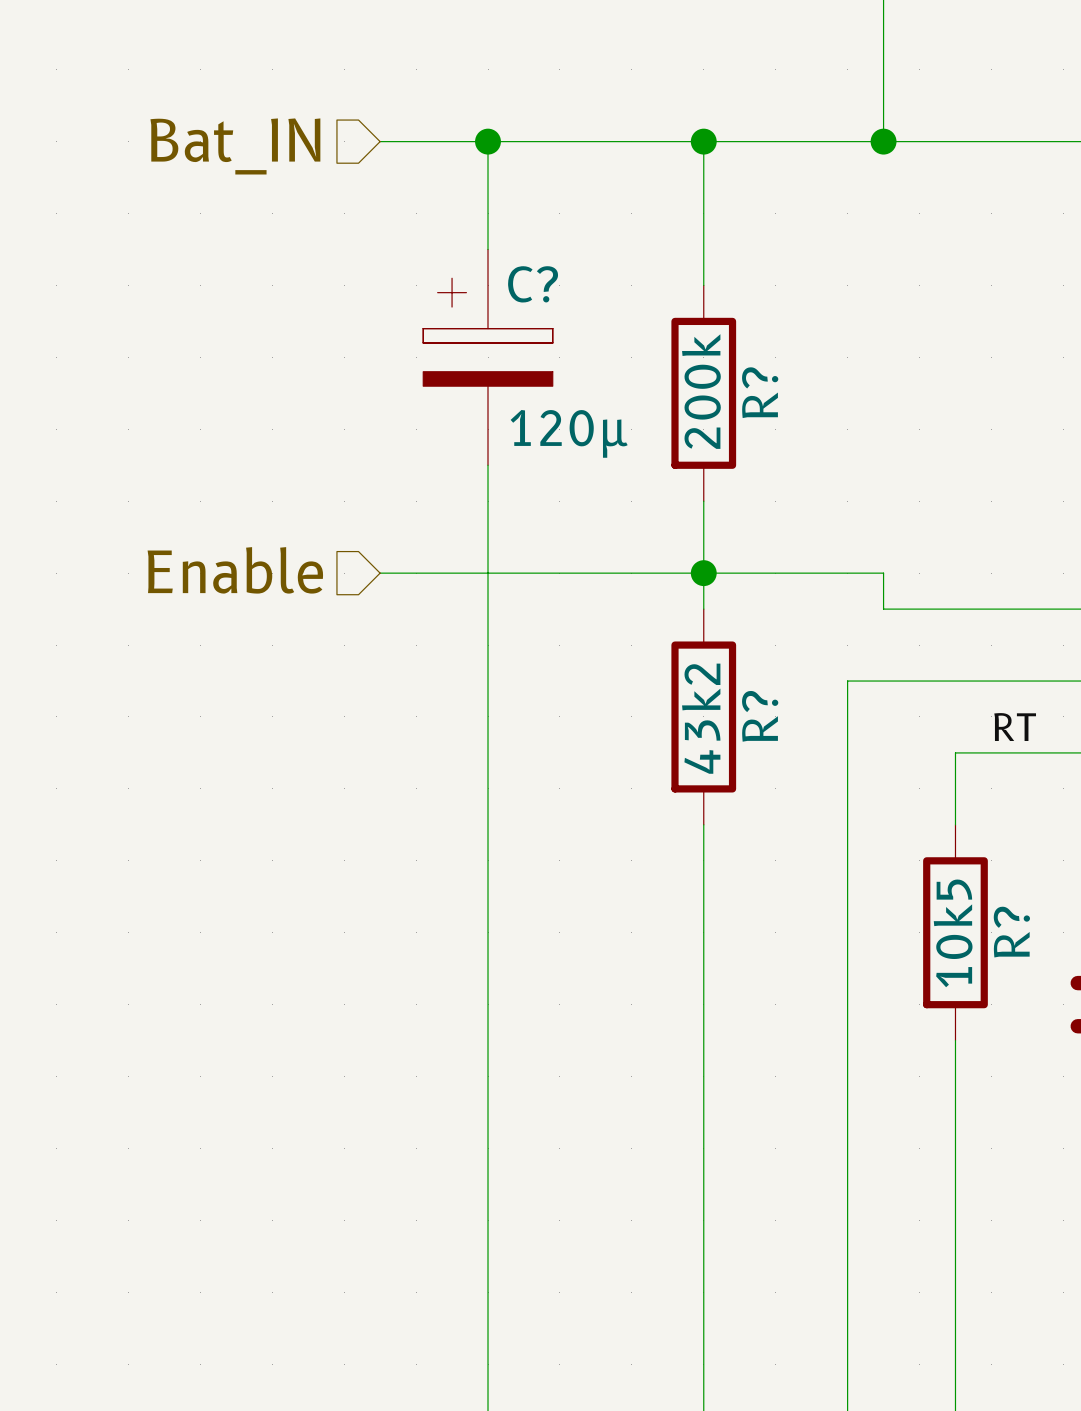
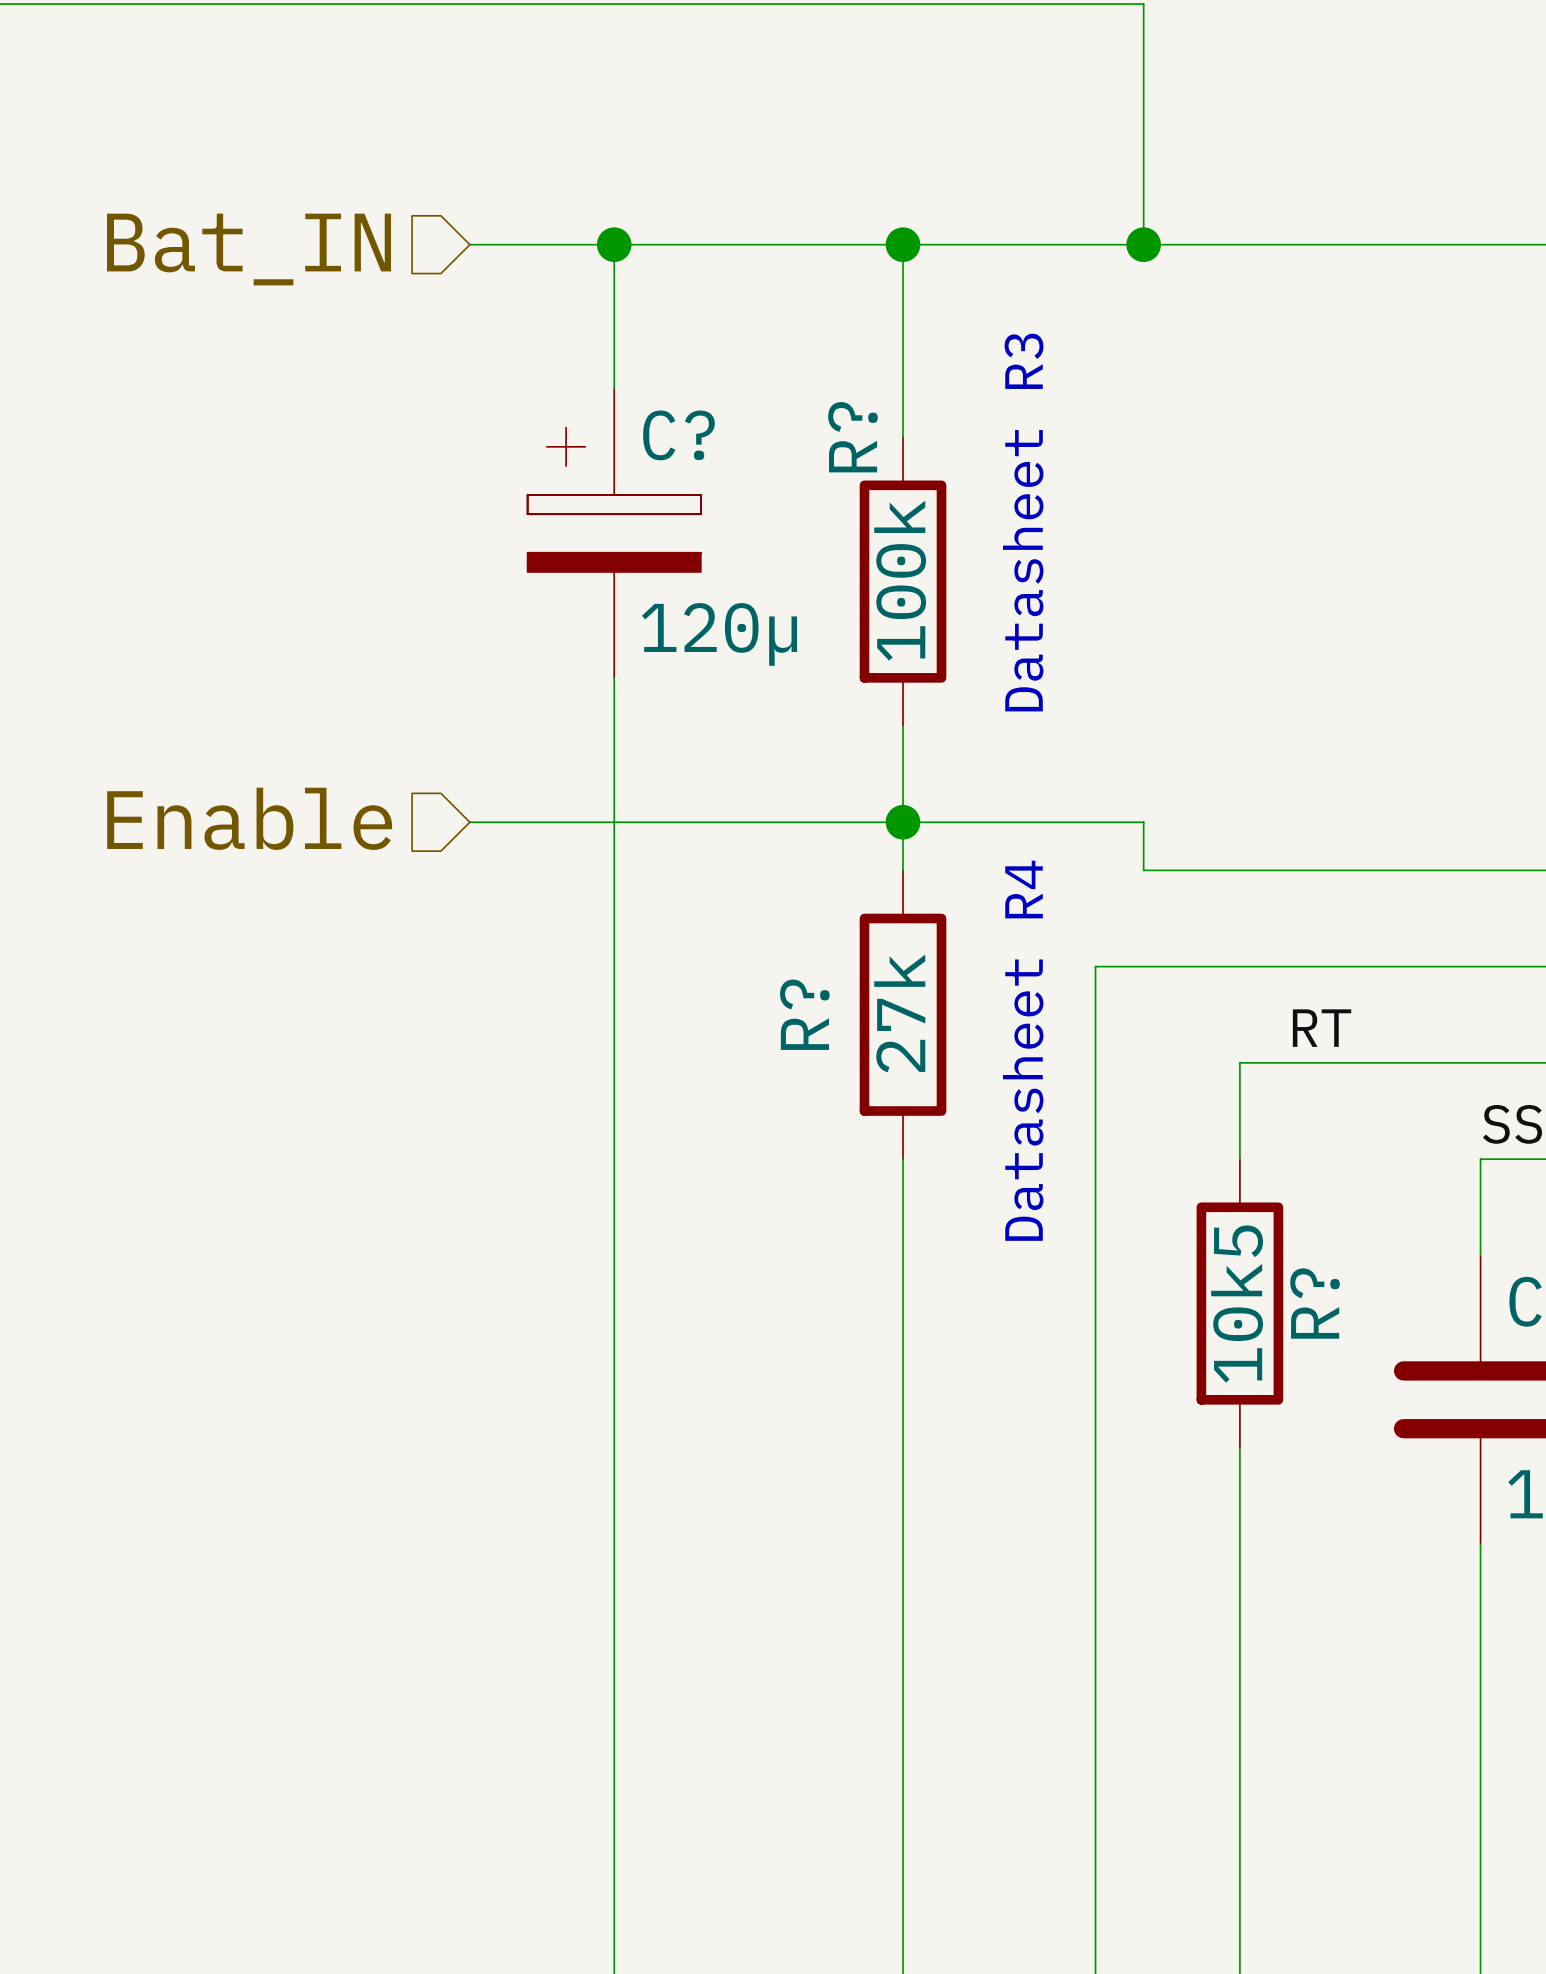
text: none -> Datasheet R3 (1023, 522)
R? value: 200k (701, 391) -> 100k (900, 580)
R? name position: R? (760, 392) -> R? (852, 437)
R? name position: R? (760, 716) -> R? (804, 1014)
R? value: 43k2 (701, 718) -> 27k (899, 1013)
text: none -> Datasheet R4 (1023, 1050)

